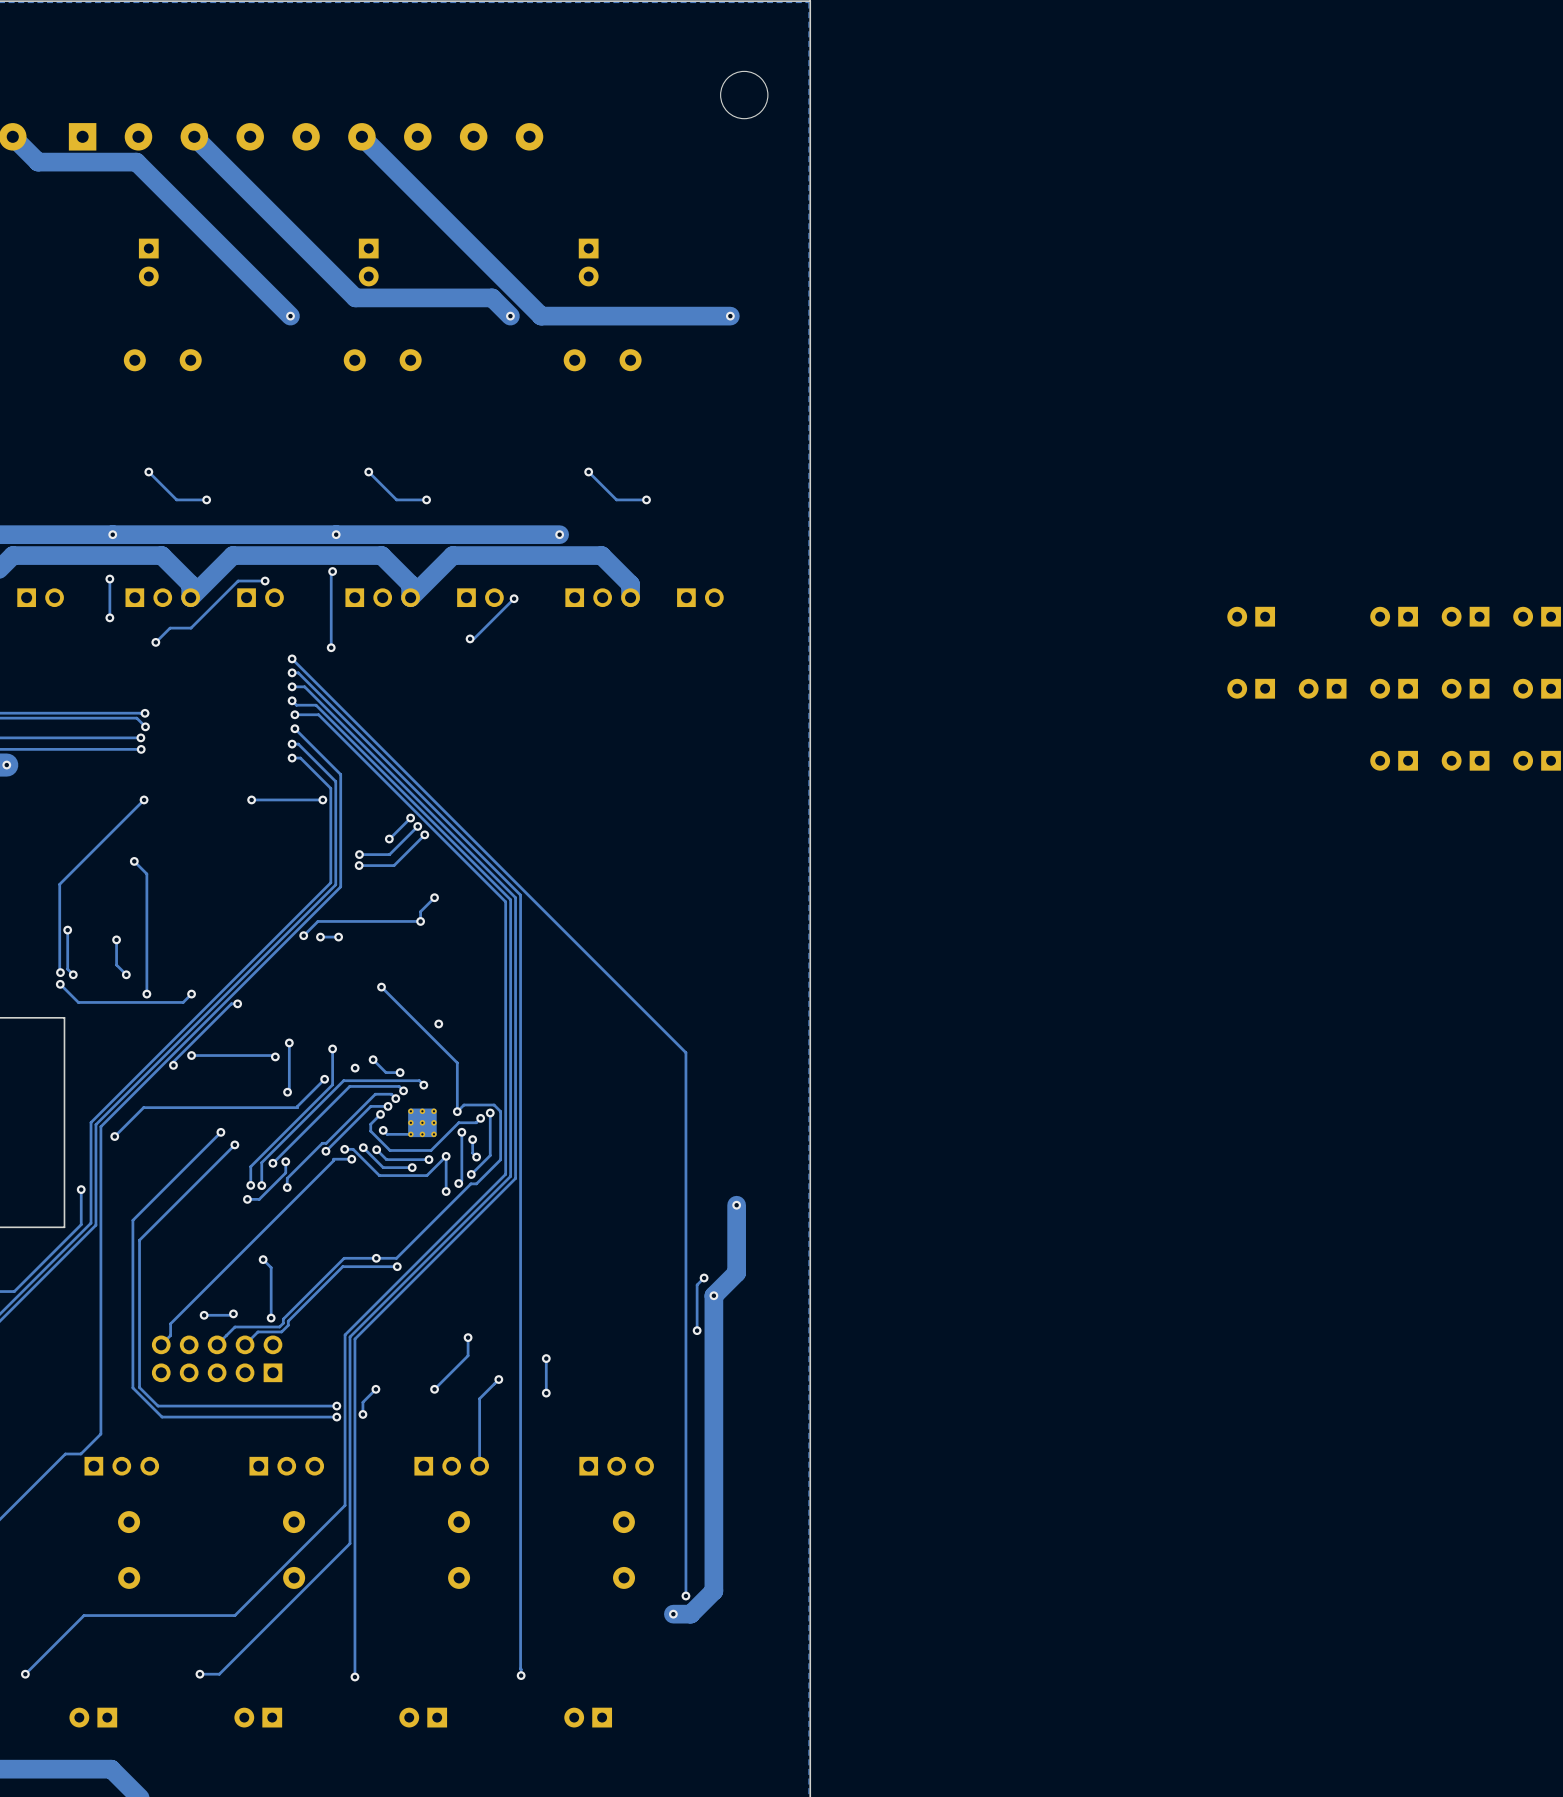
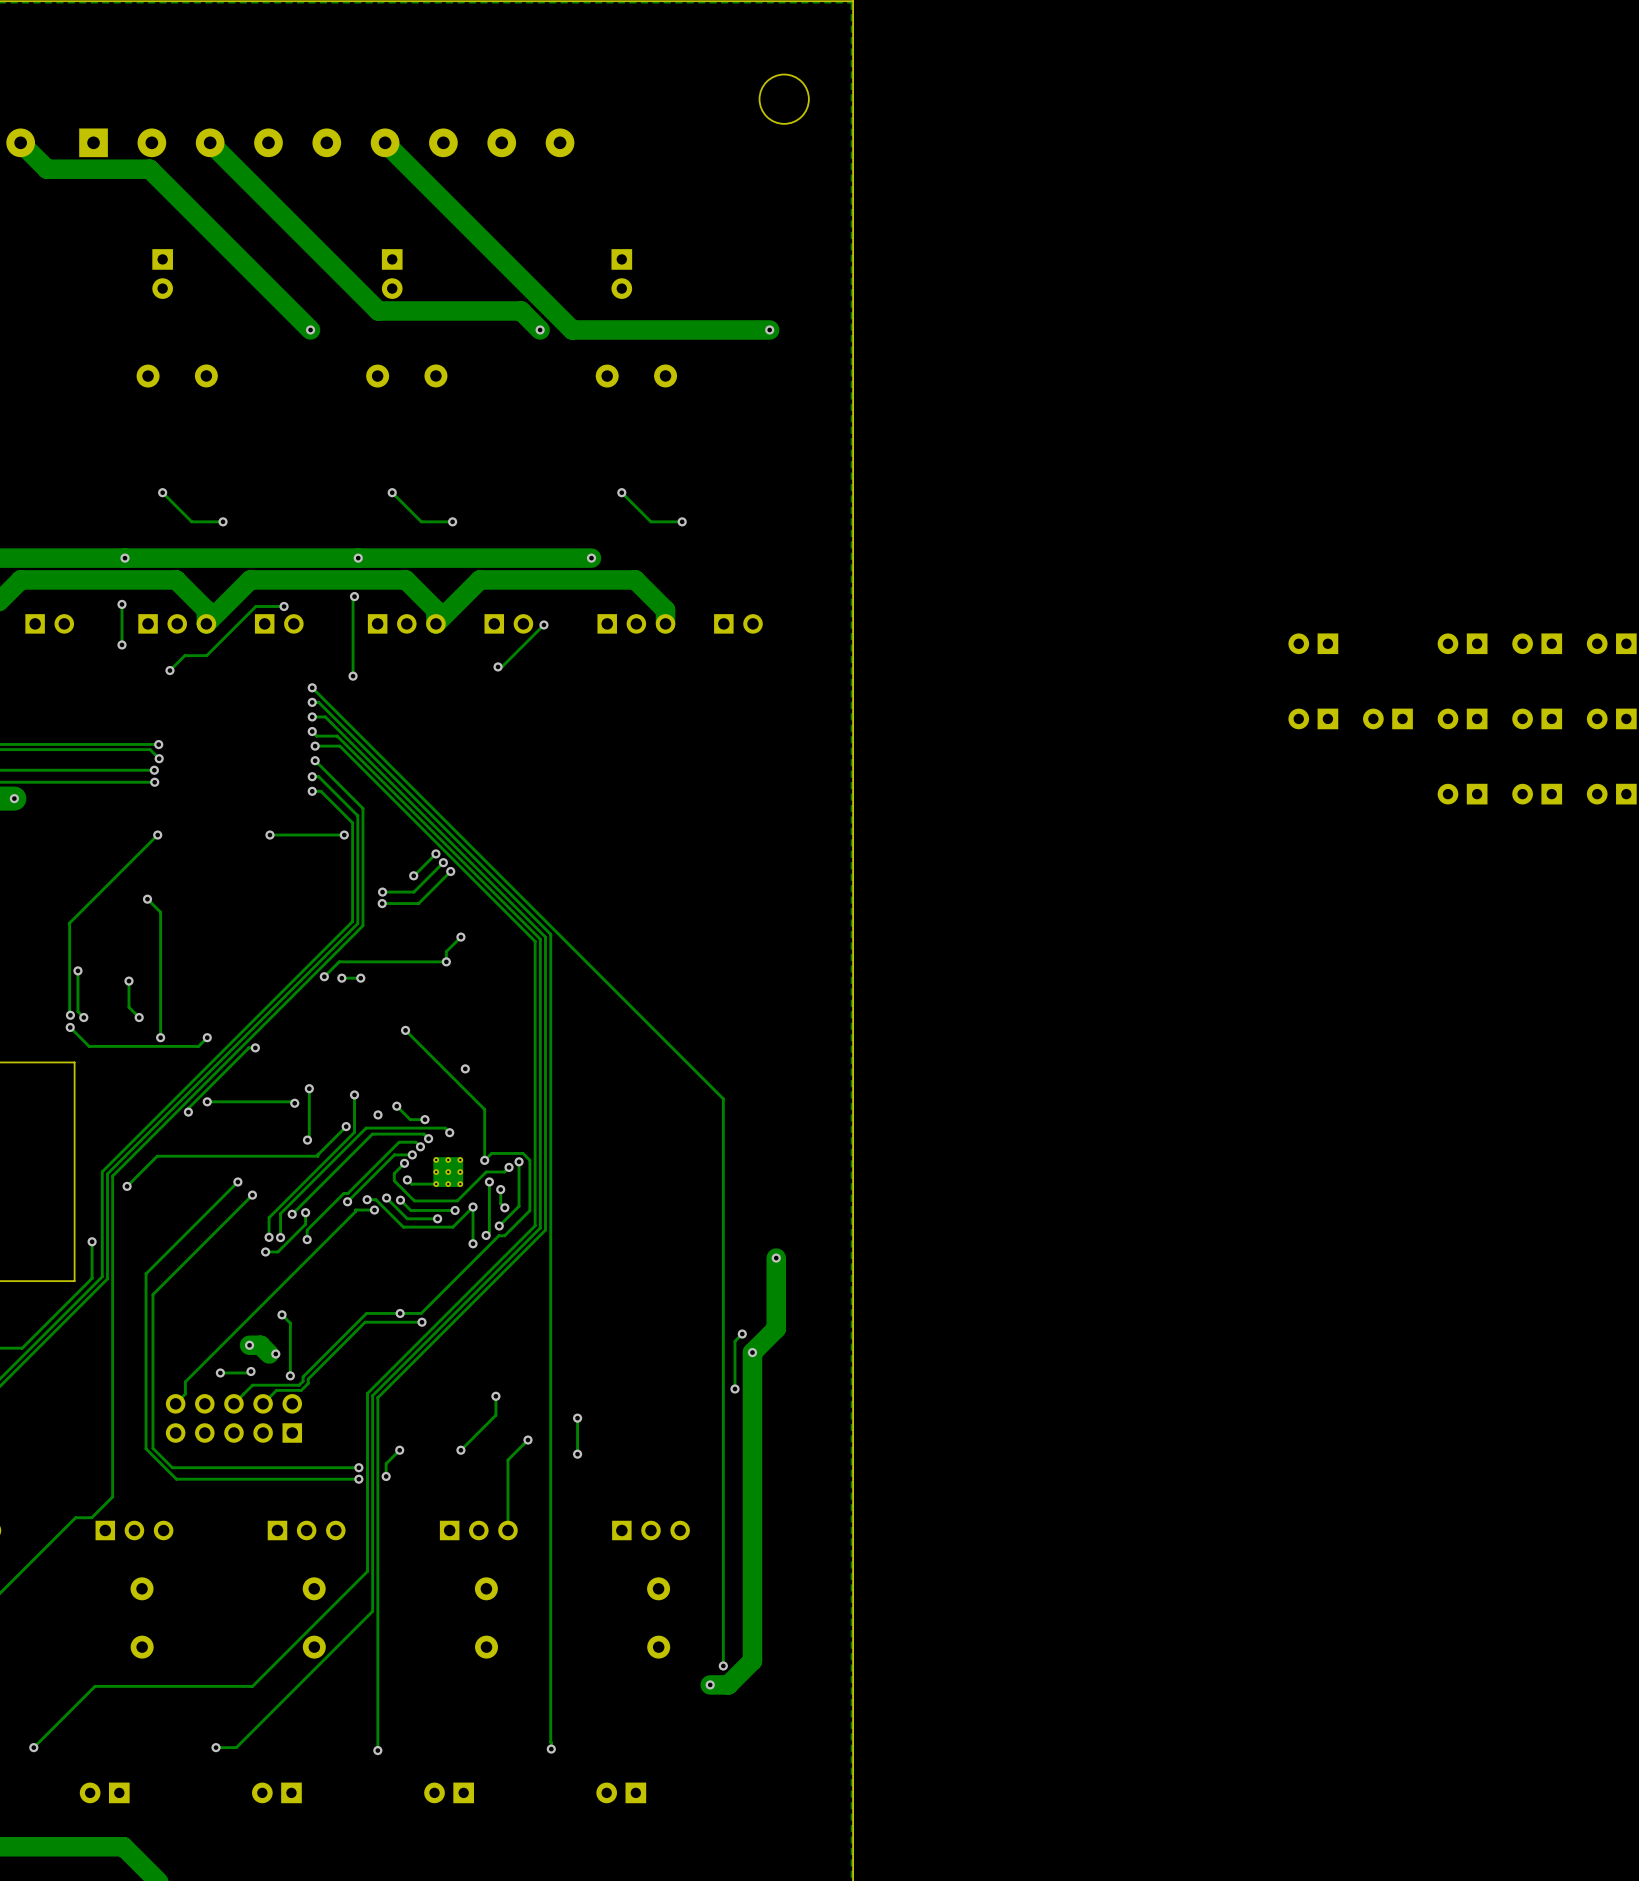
track: none -> (249, 1345) (260, 1345) (269, 1354) (275, 1354)
via: none -> (249, 1345)
via: none -> (275, 1354)

